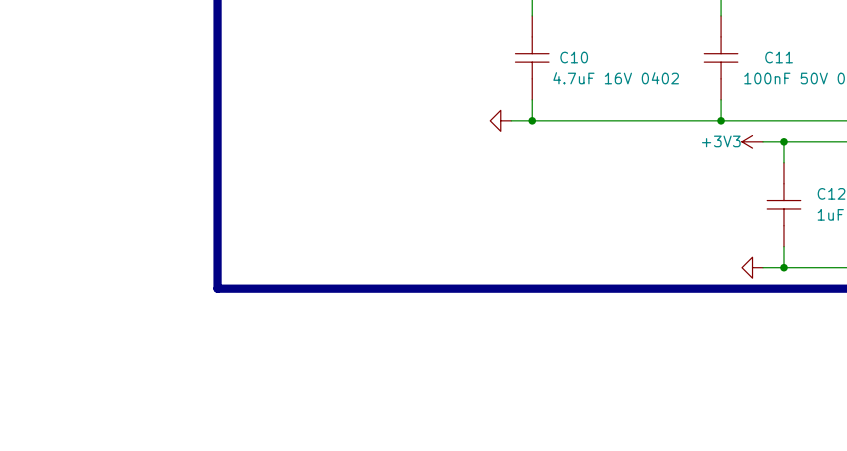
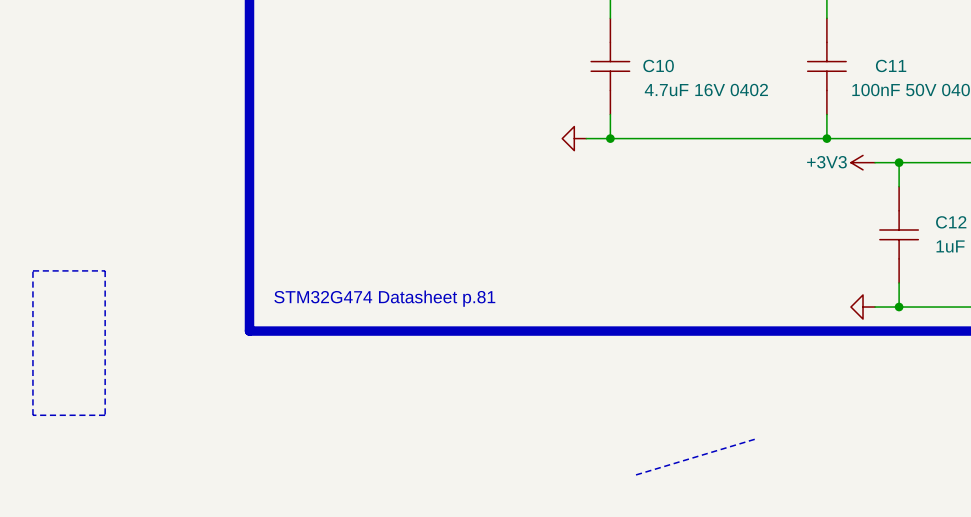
line: none -> (32, 270) (105, 270) (105, 415) (32, 415) (32, 270)
text: none -> STM32G474 Datasheet p.81 (384, 298)
line: none -> (754, 439) (634, 475)

